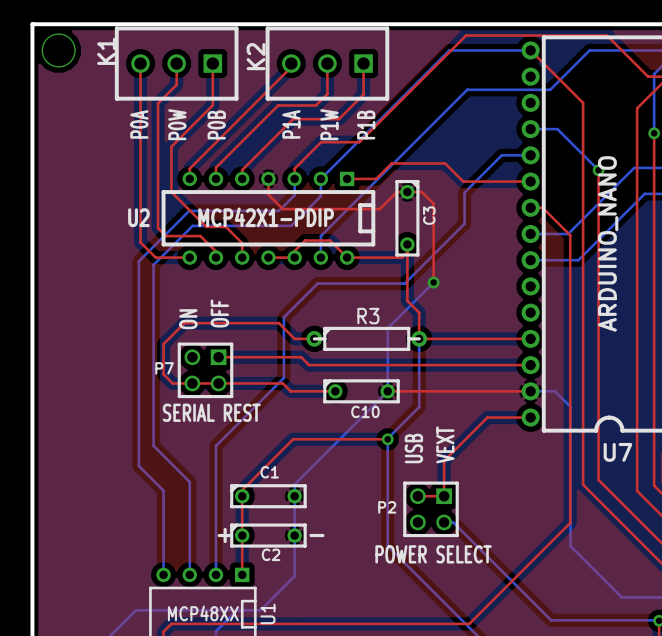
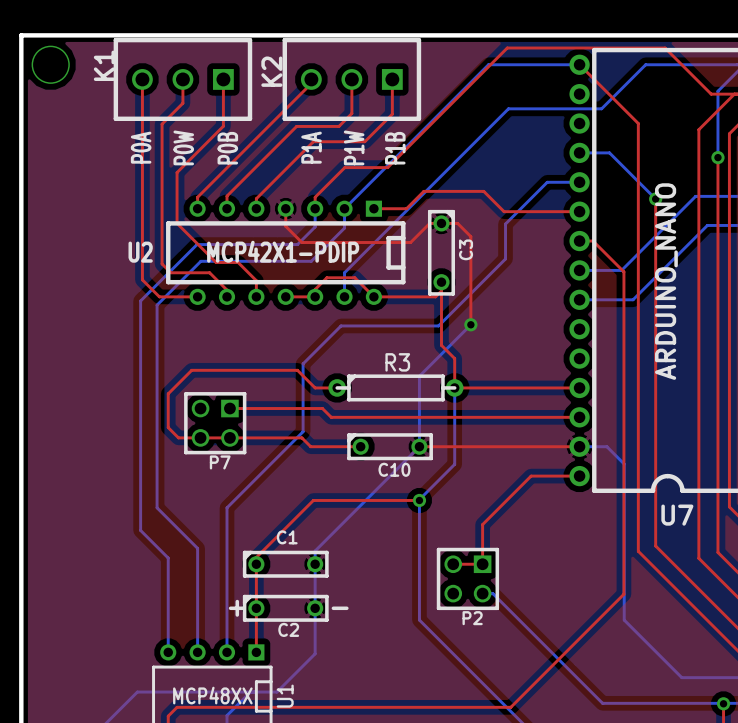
text: OFF (219, 313) -> none
text: ON (188, 319) -> none
P7 name position: P7 (164, 368) -> P7 (220, 462)
text: SERIAL REST (211, 412) -> none
text: VEXT (445, 444) -> none
text: USB (413, 448) -> none
P2 name position: P2 (387, 507) -> P2 (472, 618)
text: POWER SELECT (433, 554) -> none

